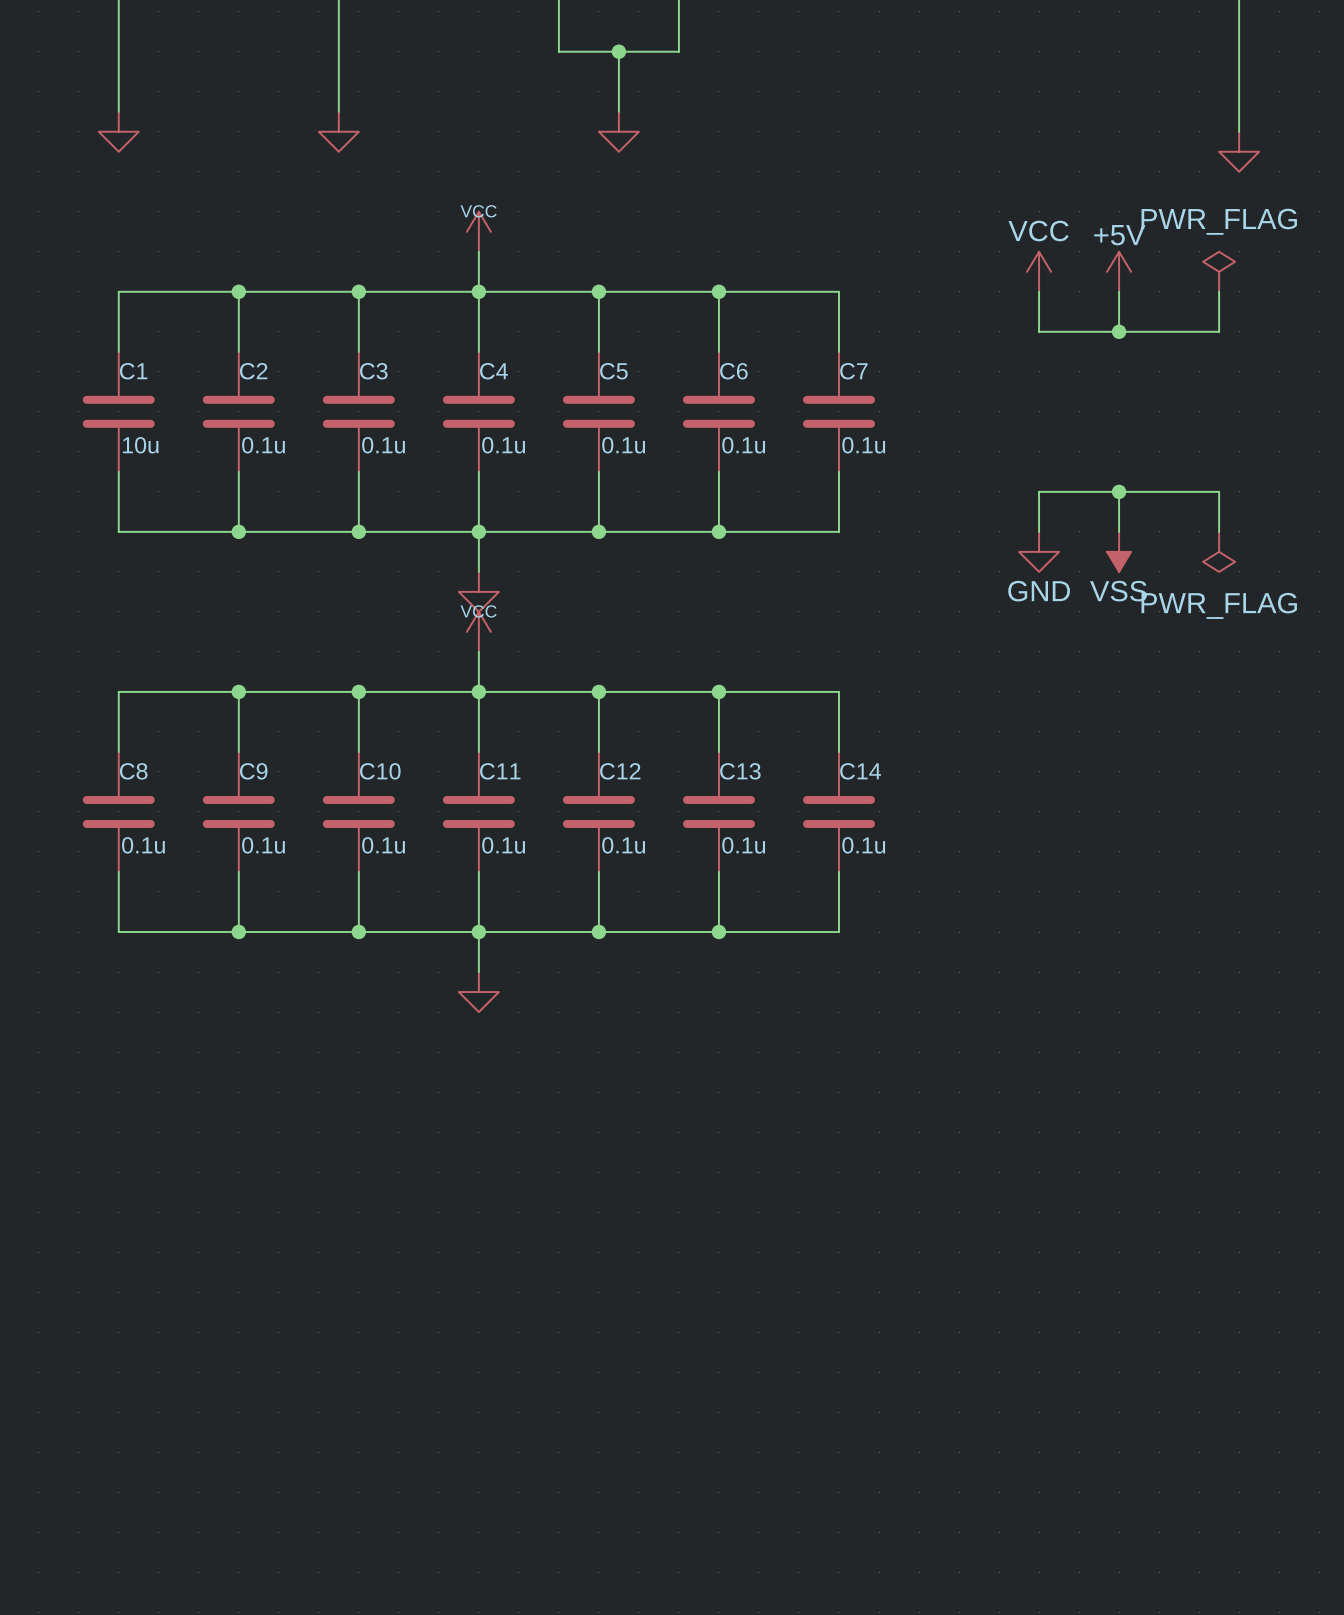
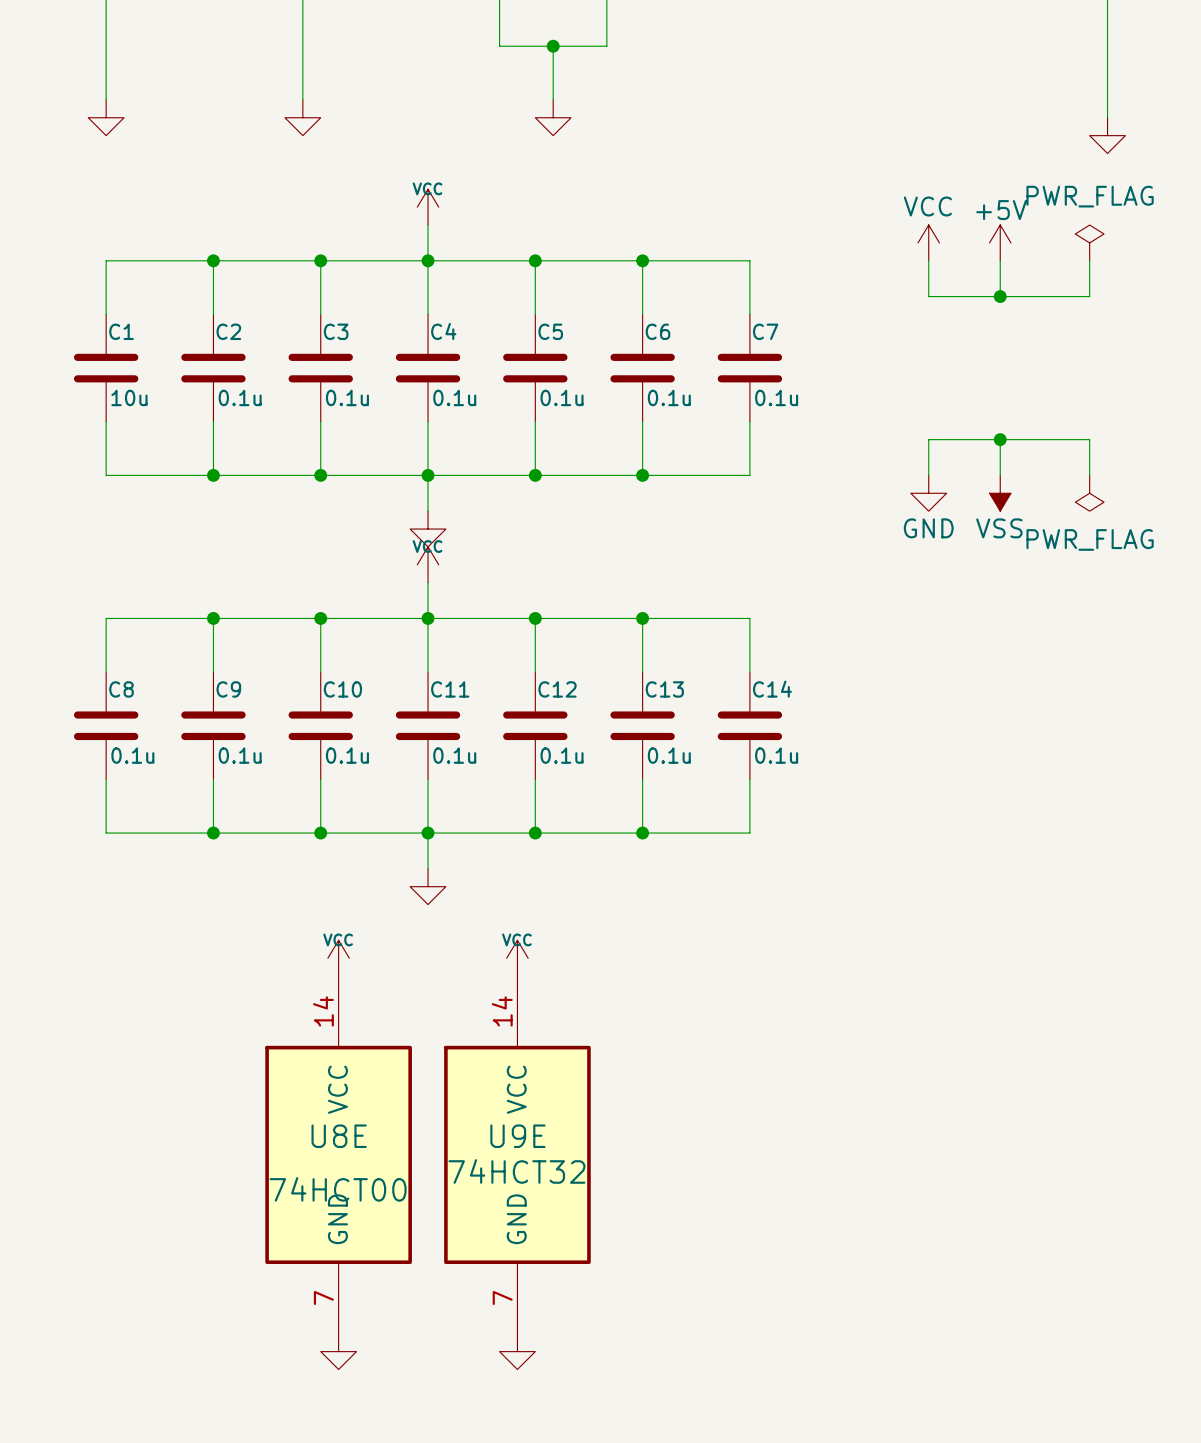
power symbol: none -> VCC (338, 958)
power symbol: none -> VCC (517, 958)
U8E: none -> 74HCT00 (338, 1154)
U9E: none -> 74HCT32 (517, 1154)
power symbol: none -> (338, 1351)
power symbol: none -> (517, 1351)

